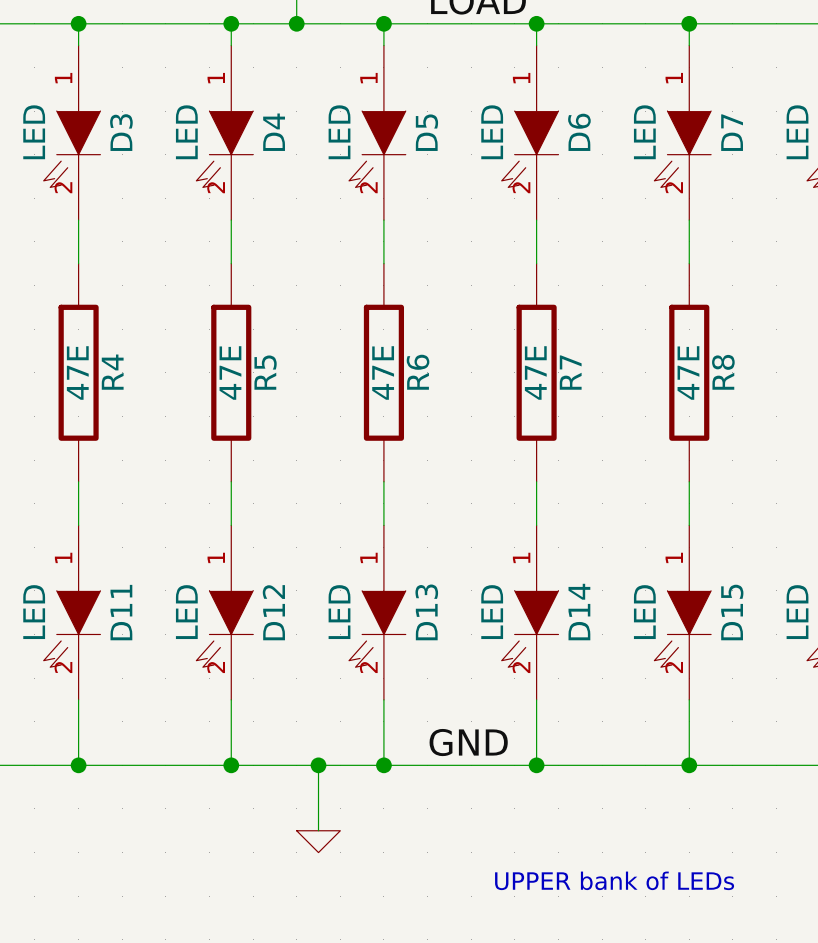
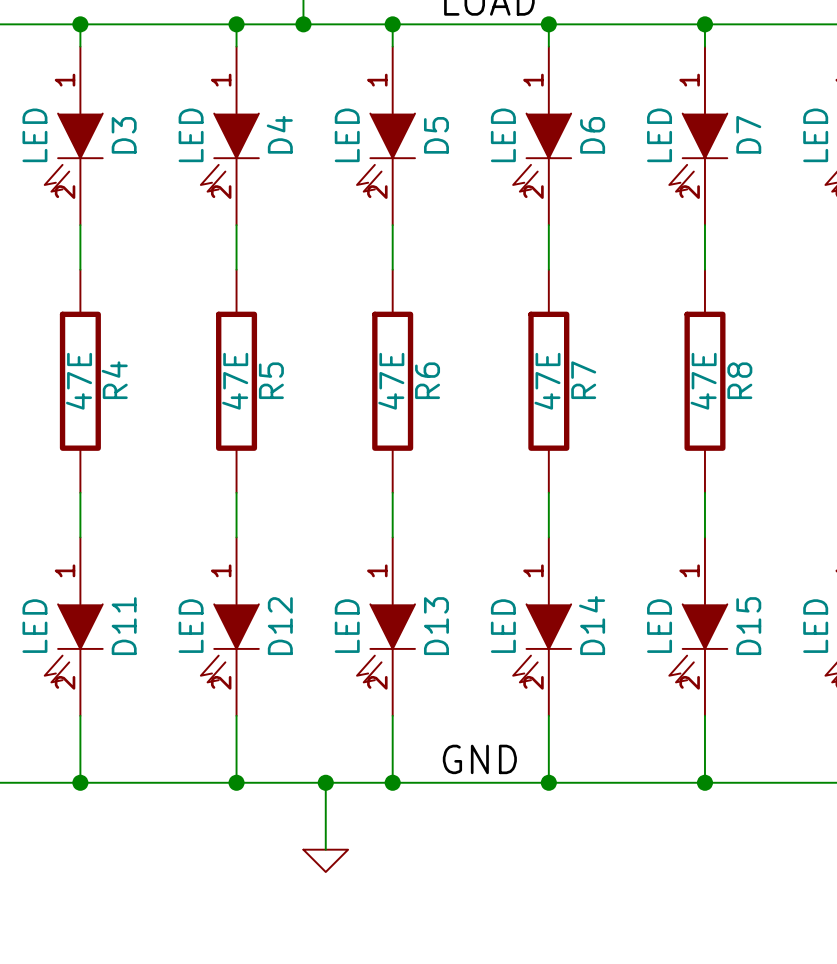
text: UPPER bank of LEDs (614, 880) -> none

